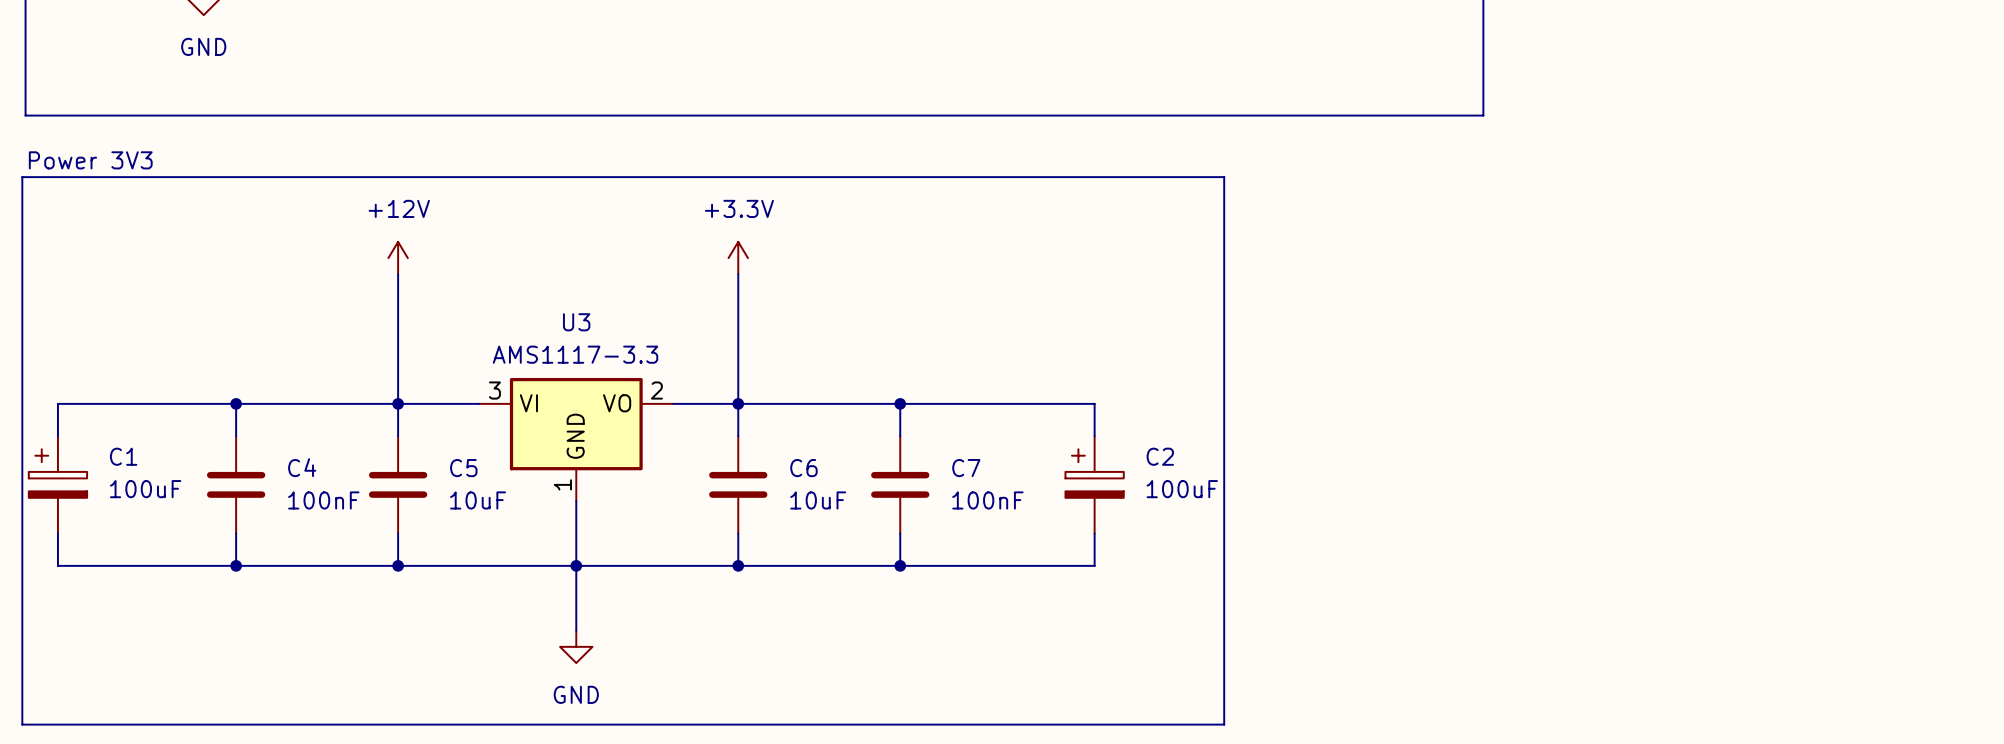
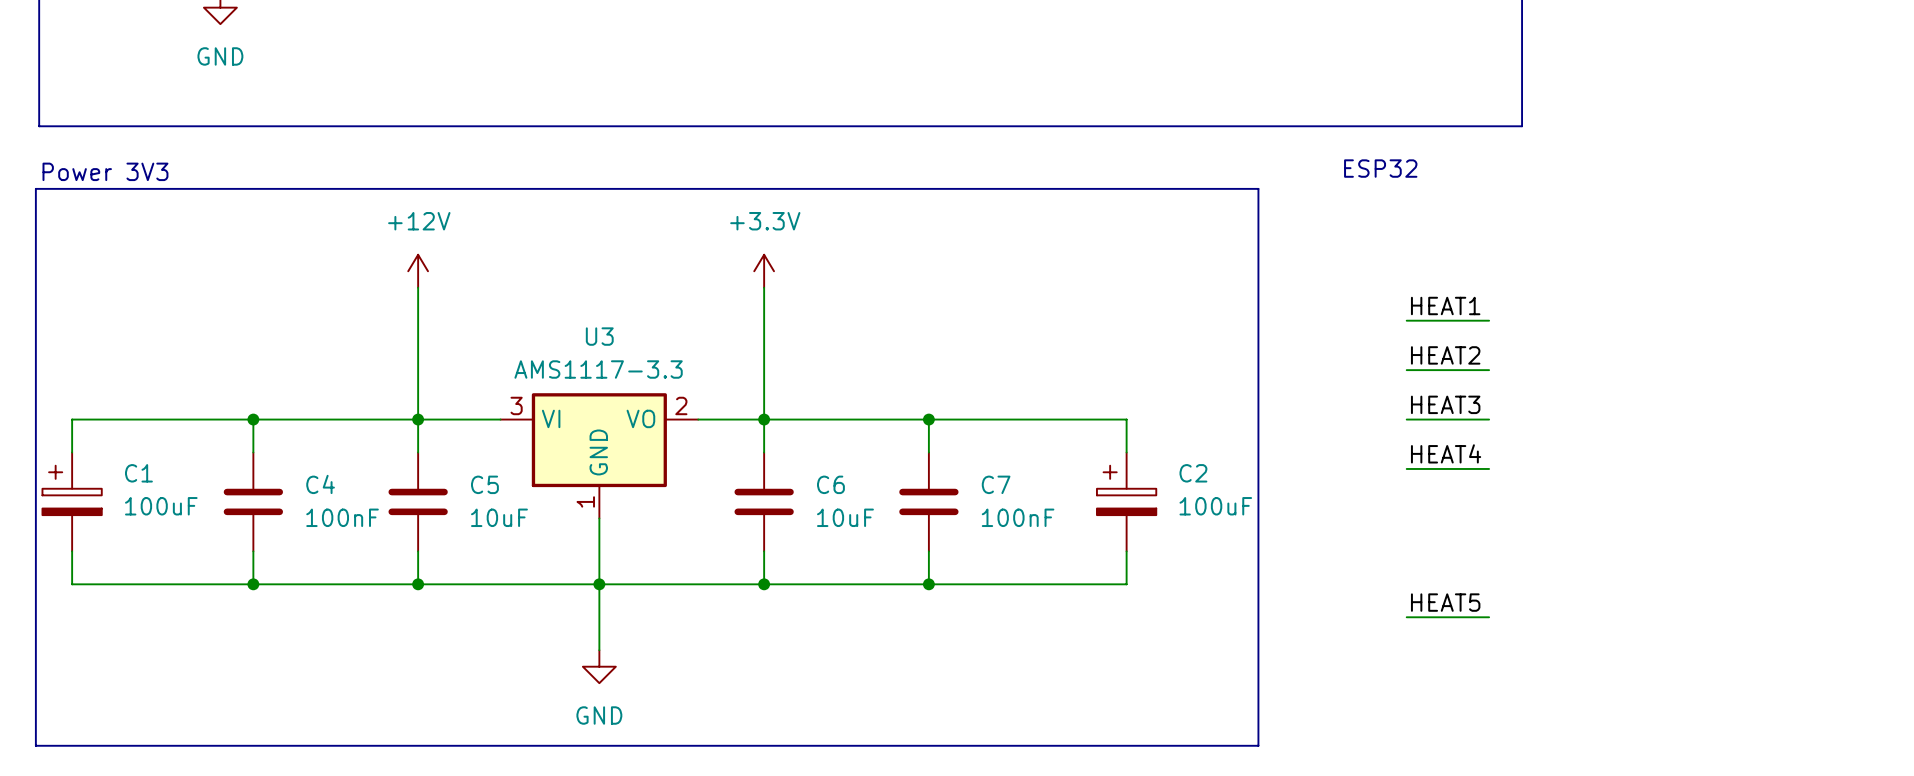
text: none -> ESP32 (1380, 168)
label: none -> HEAT1 (1445, 305)
wire: none -> (1406, 320) (1489, 320)
label: none -> HEAT2 (1445, 355)
wire: none -> (1406, 370) (1489, 370)
label: none -> HEAT3 (1445, 404)
wire: none -> (1406, 419) (1489, 419)
label: none -> HEAT4 (1446, 453)
wire: none -> (1406, 468) (1489, 468)
label: none -> HEAT5 (1445, 602)
wire: none -> (1406, 617) (1489, 617)

